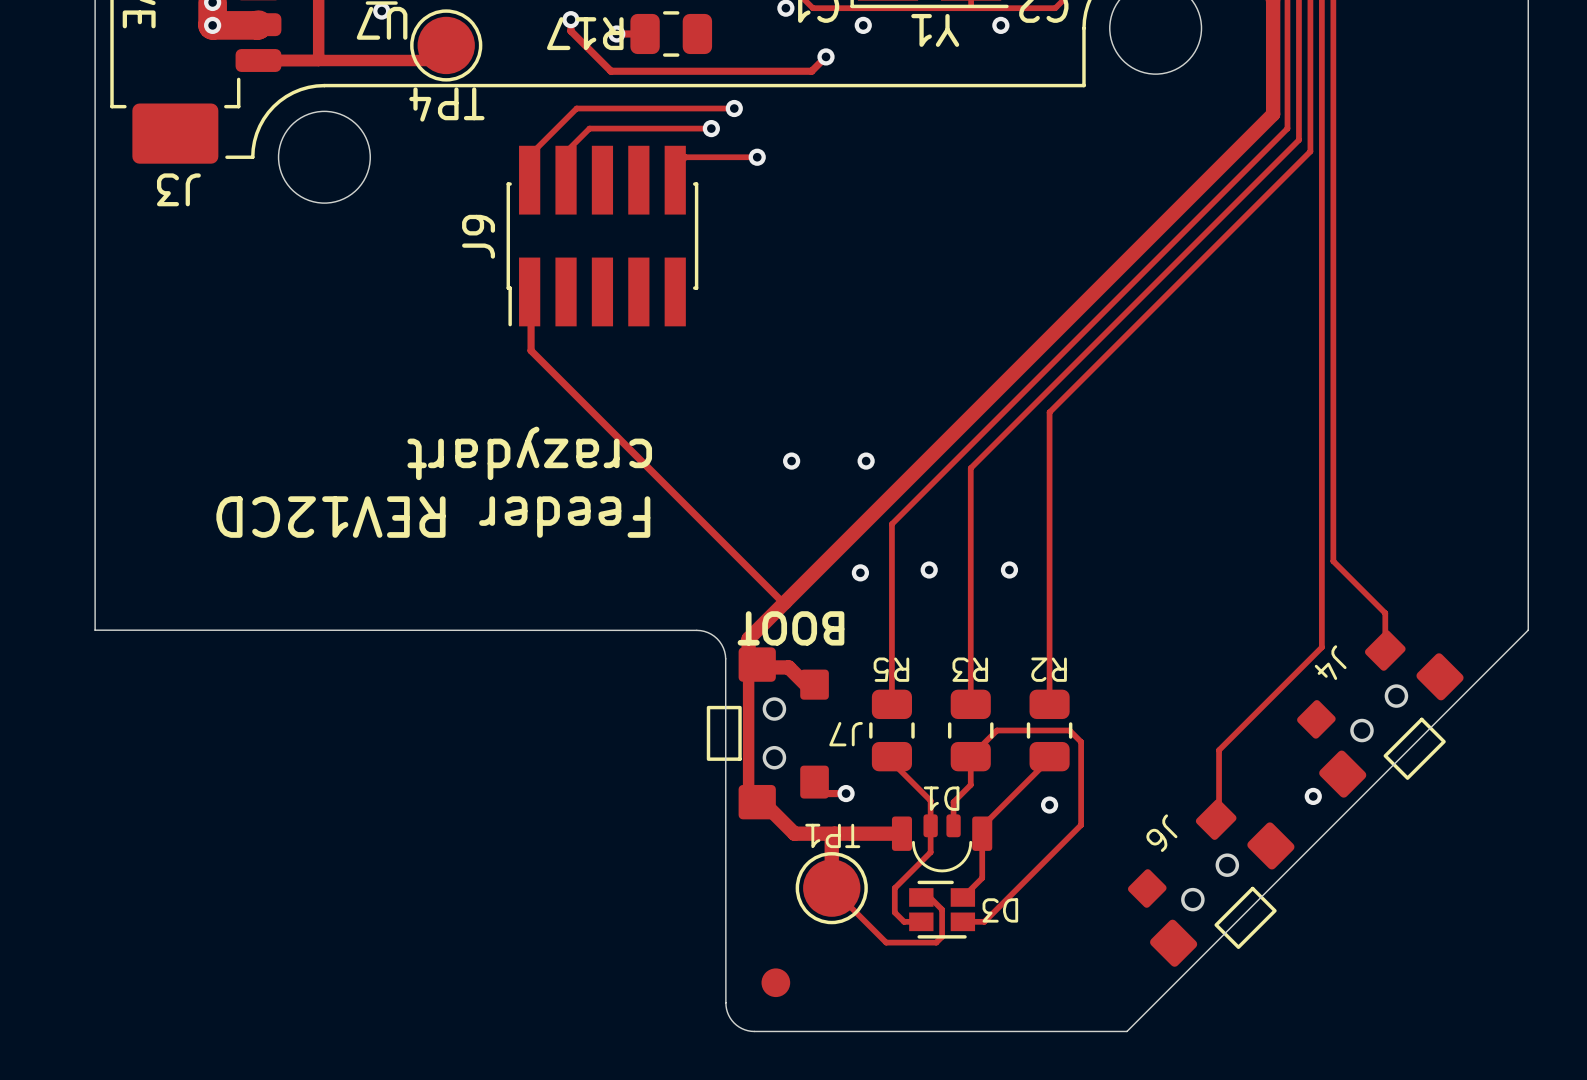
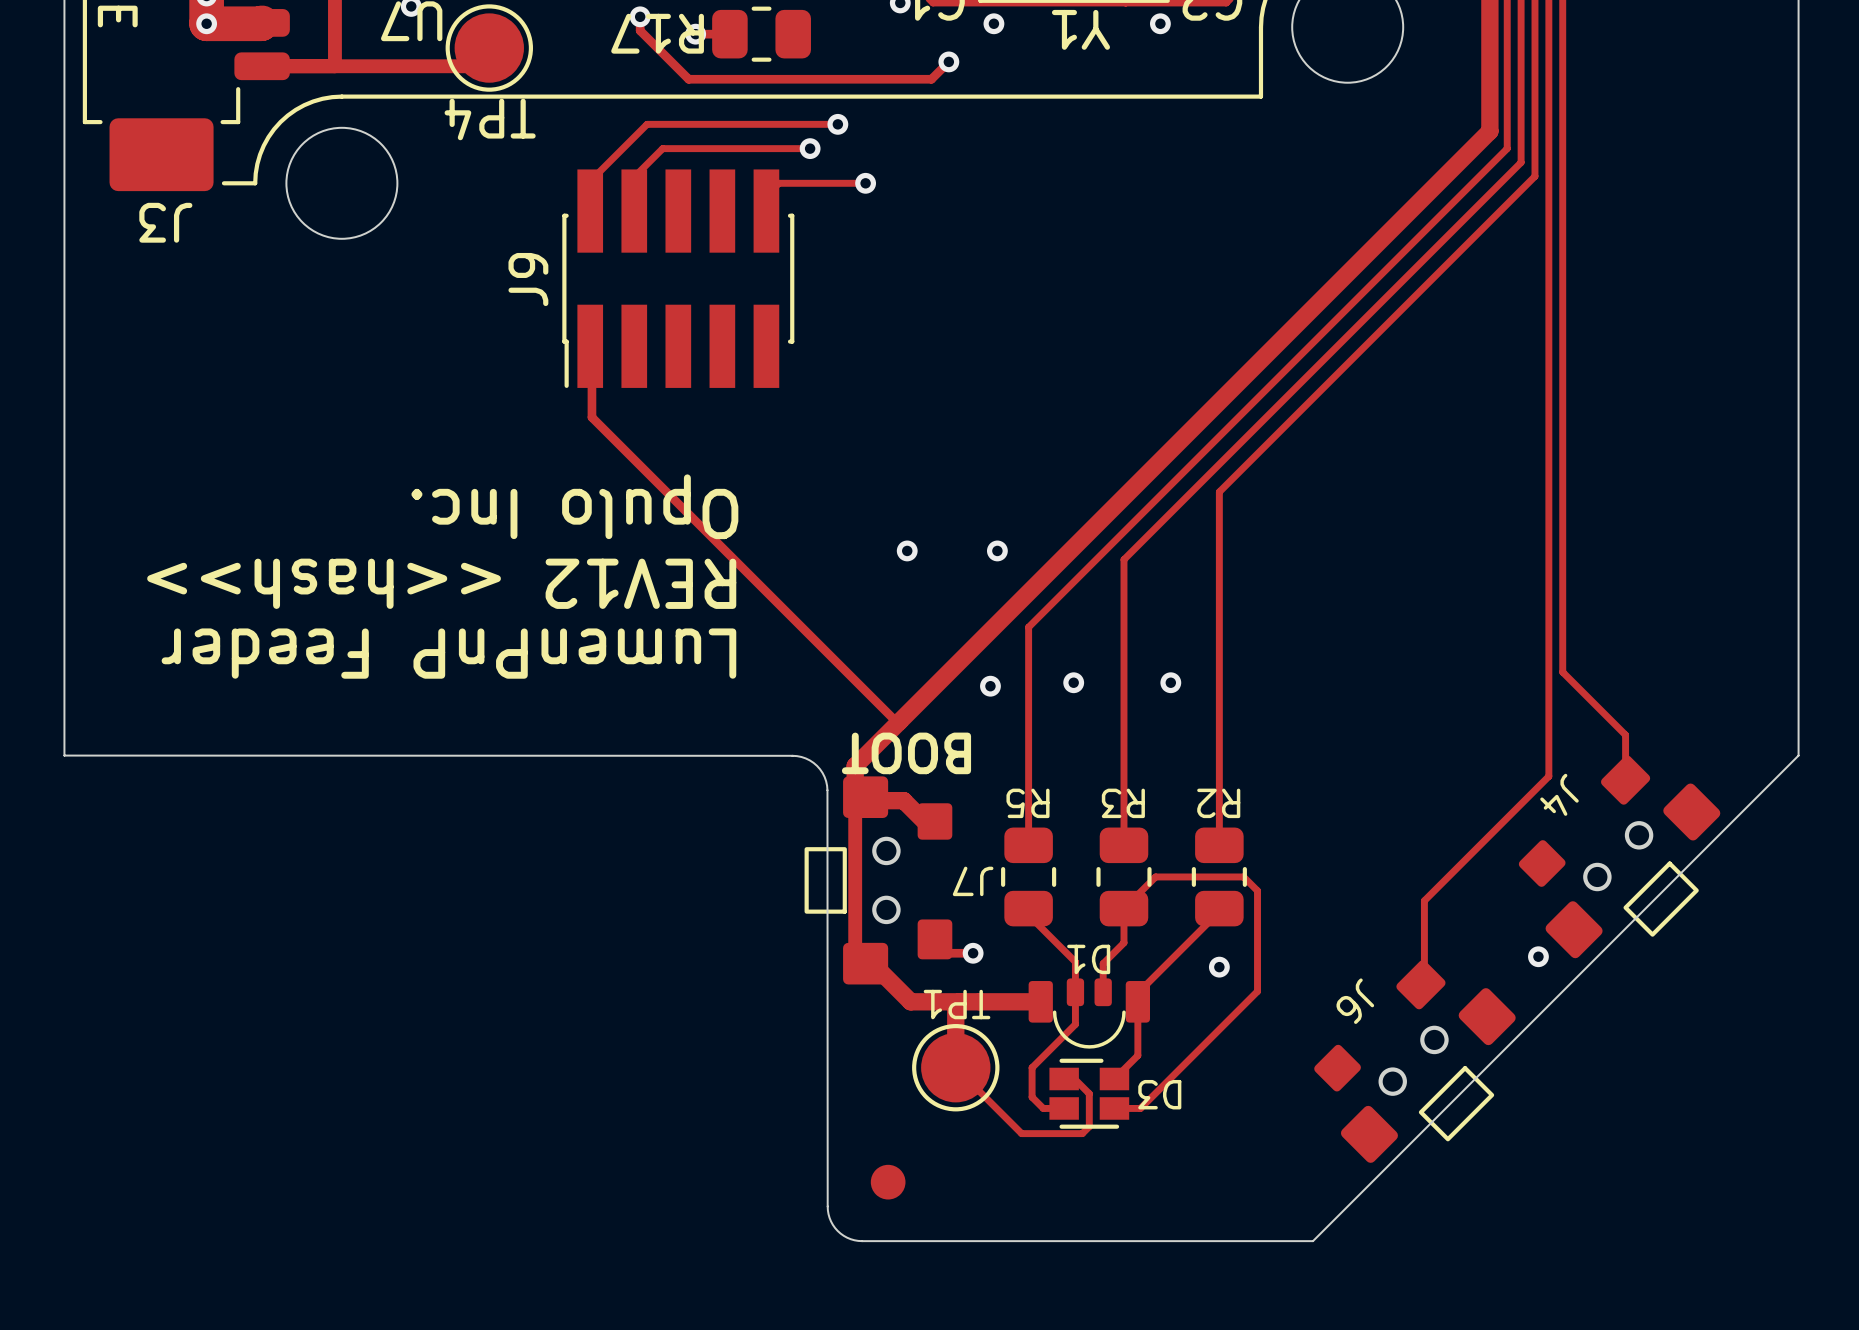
text: none -> Opulo Inc. (574, 506)
text: crazydart (529, 453) -> none
text: none -> REV12 <<hash>> (441, 583)
text: Feeder REV12CD (433, 517) -> none
text: none -> LumenPnP Feeder (448, 653)

